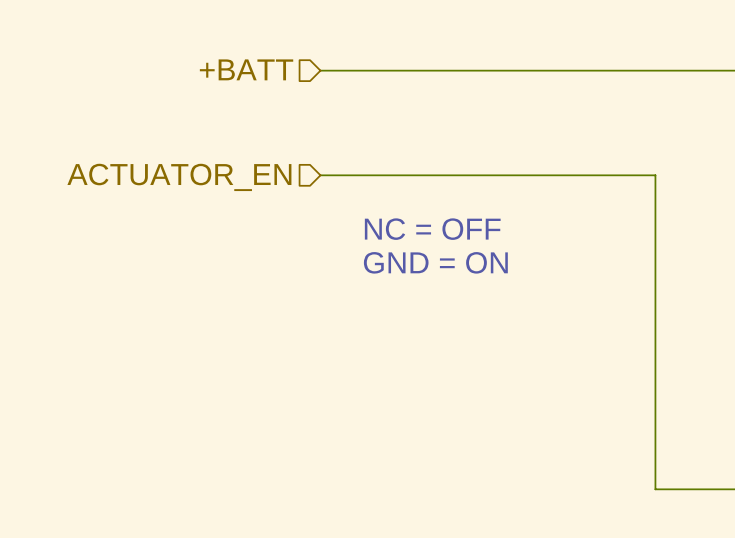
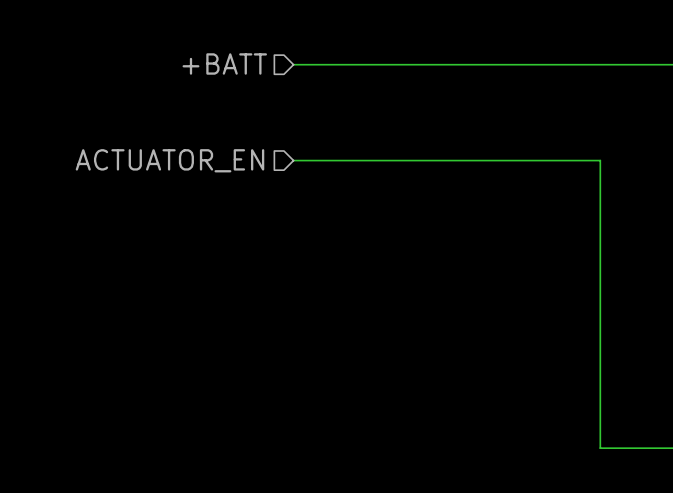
text: NC = OFF (432, 229) -> none
text: GND = ON (435, 262) -> none

